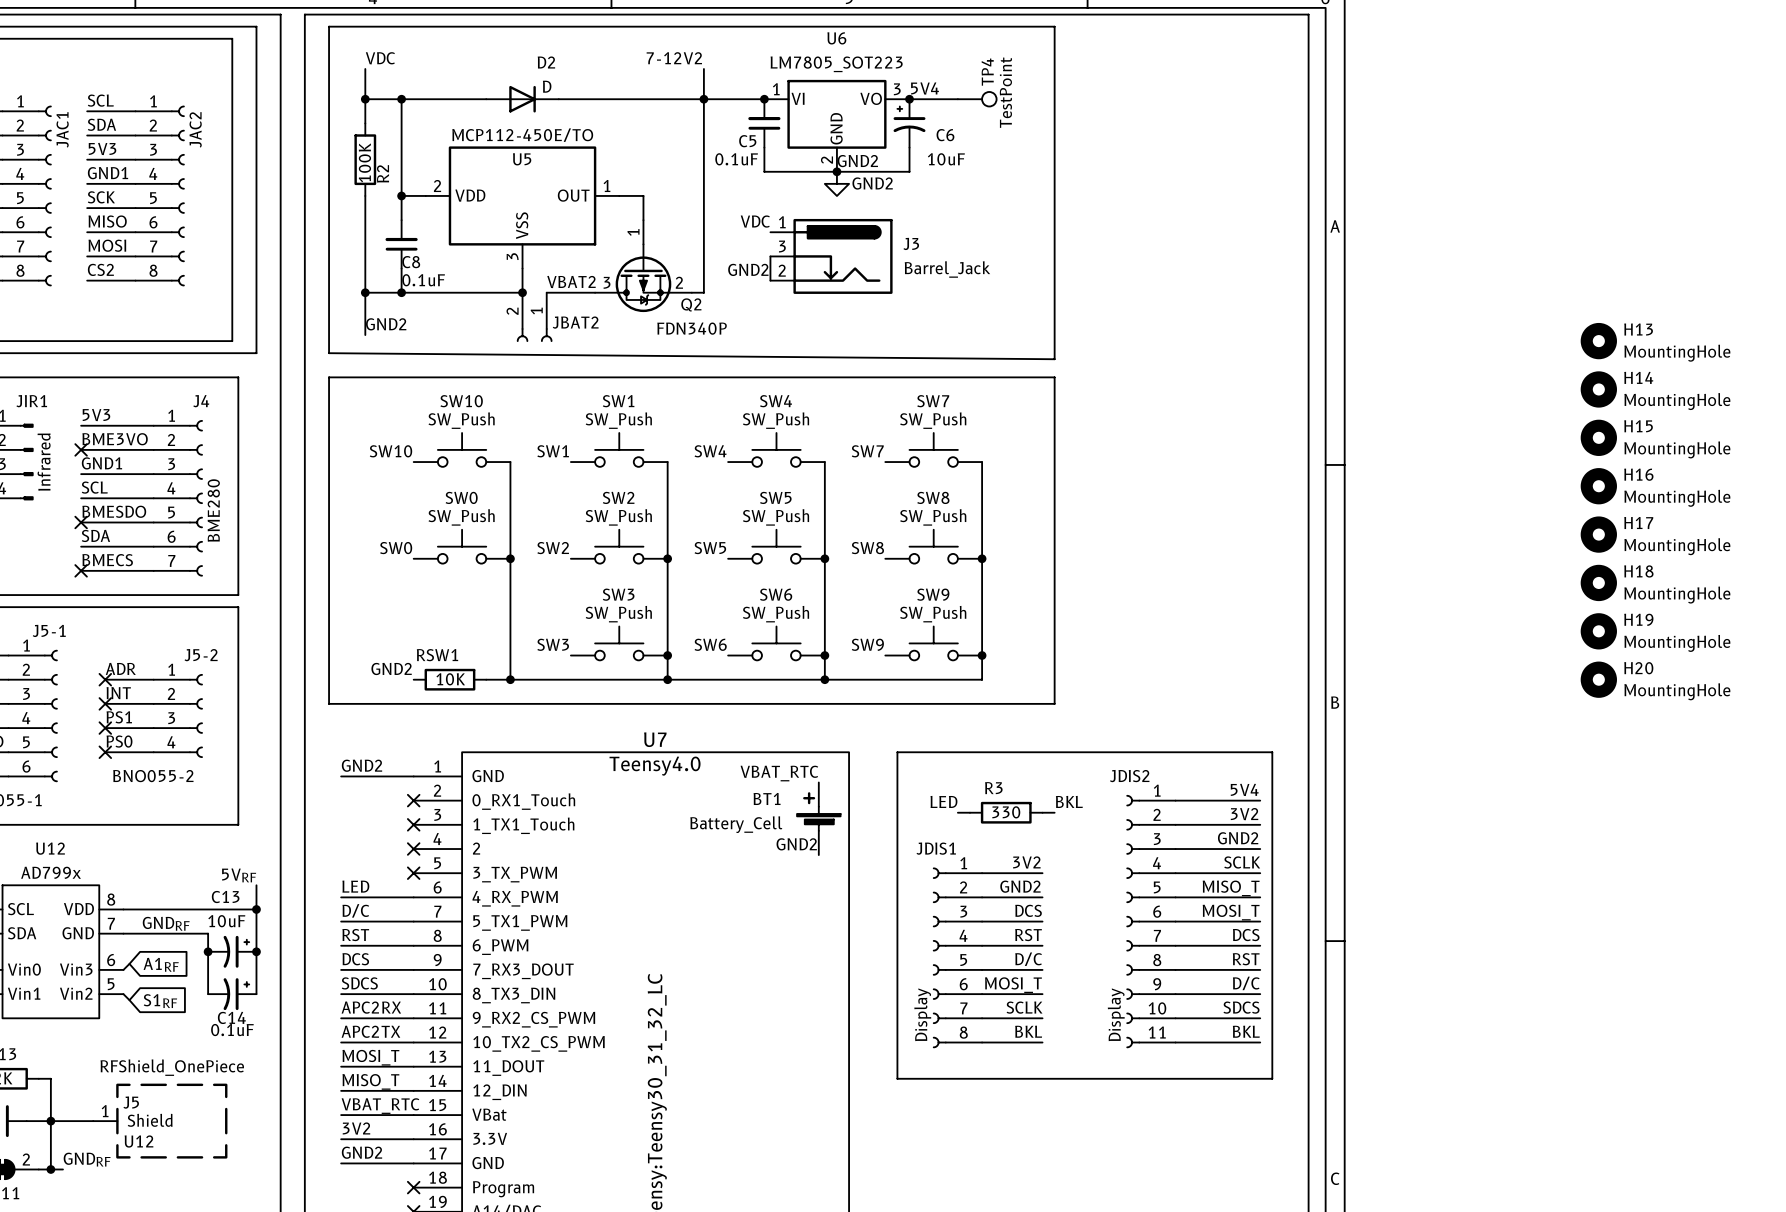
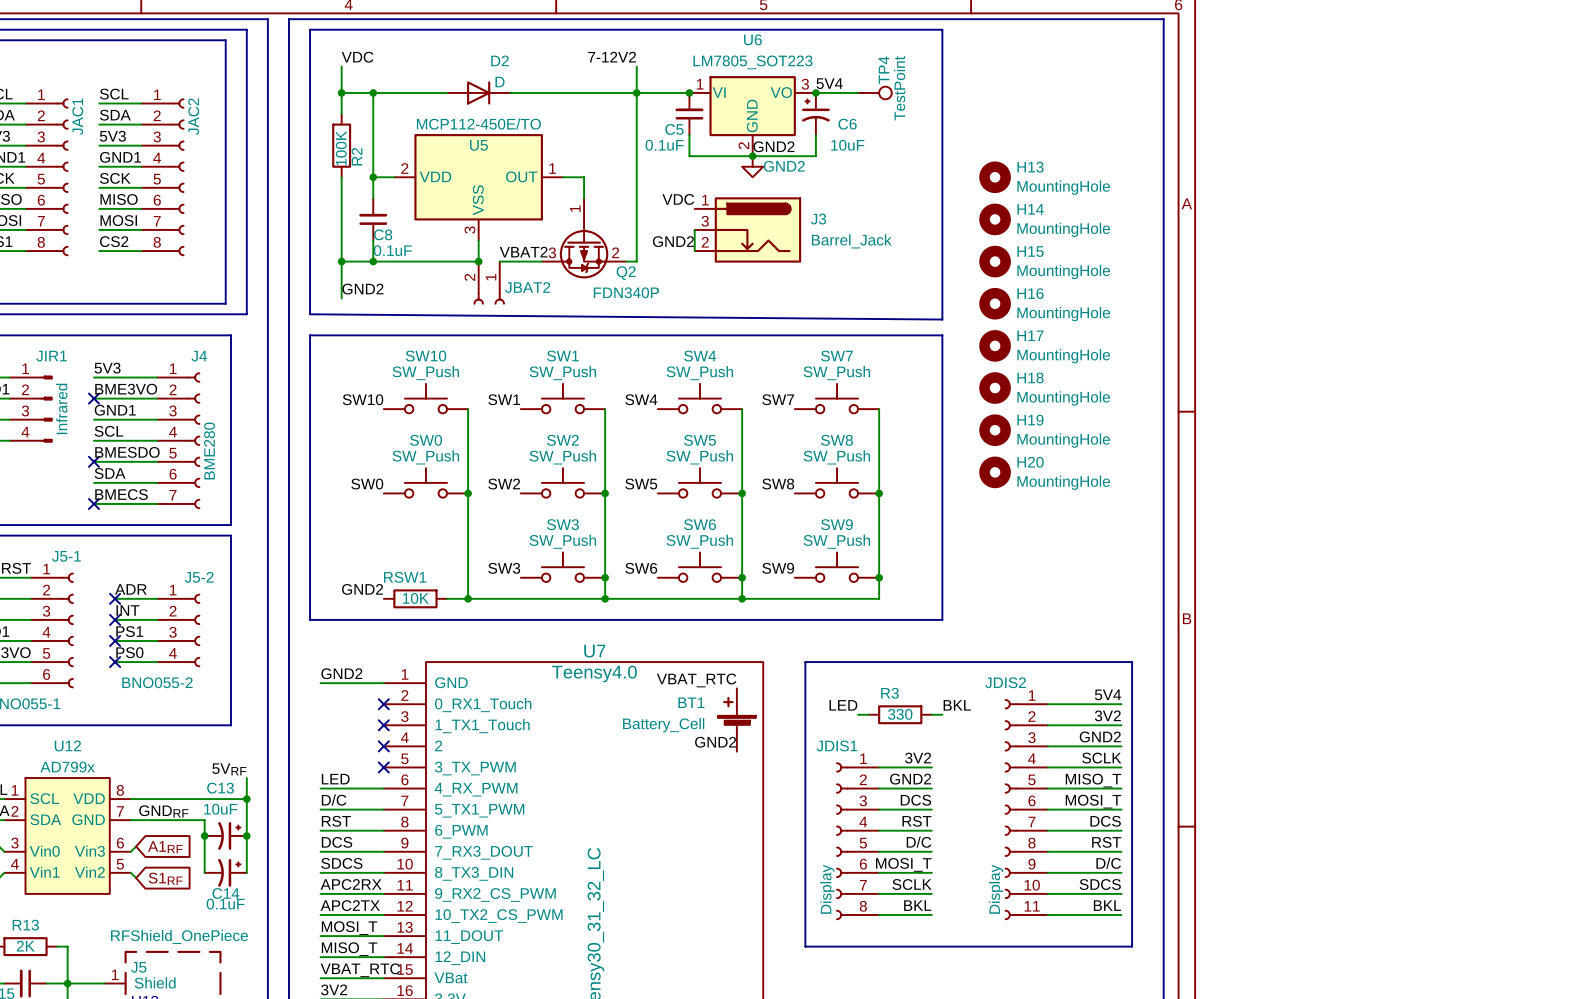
H13 position: (1598, 341) -> (995, 177)
H14 position: (1598, 389) -> (995, 219)
H15 position: (1598, 437) -> (995, 261)
H16 position: (1598, 486) -> (995, 303)
H17 position: (1598, 534) -> (995, 345)
H18 position: (1598, 582) -> (995, 388)
H19 position: (1598, 631) -> (995, 430)
H20 position: (1598, 679) -> (995, 472)

